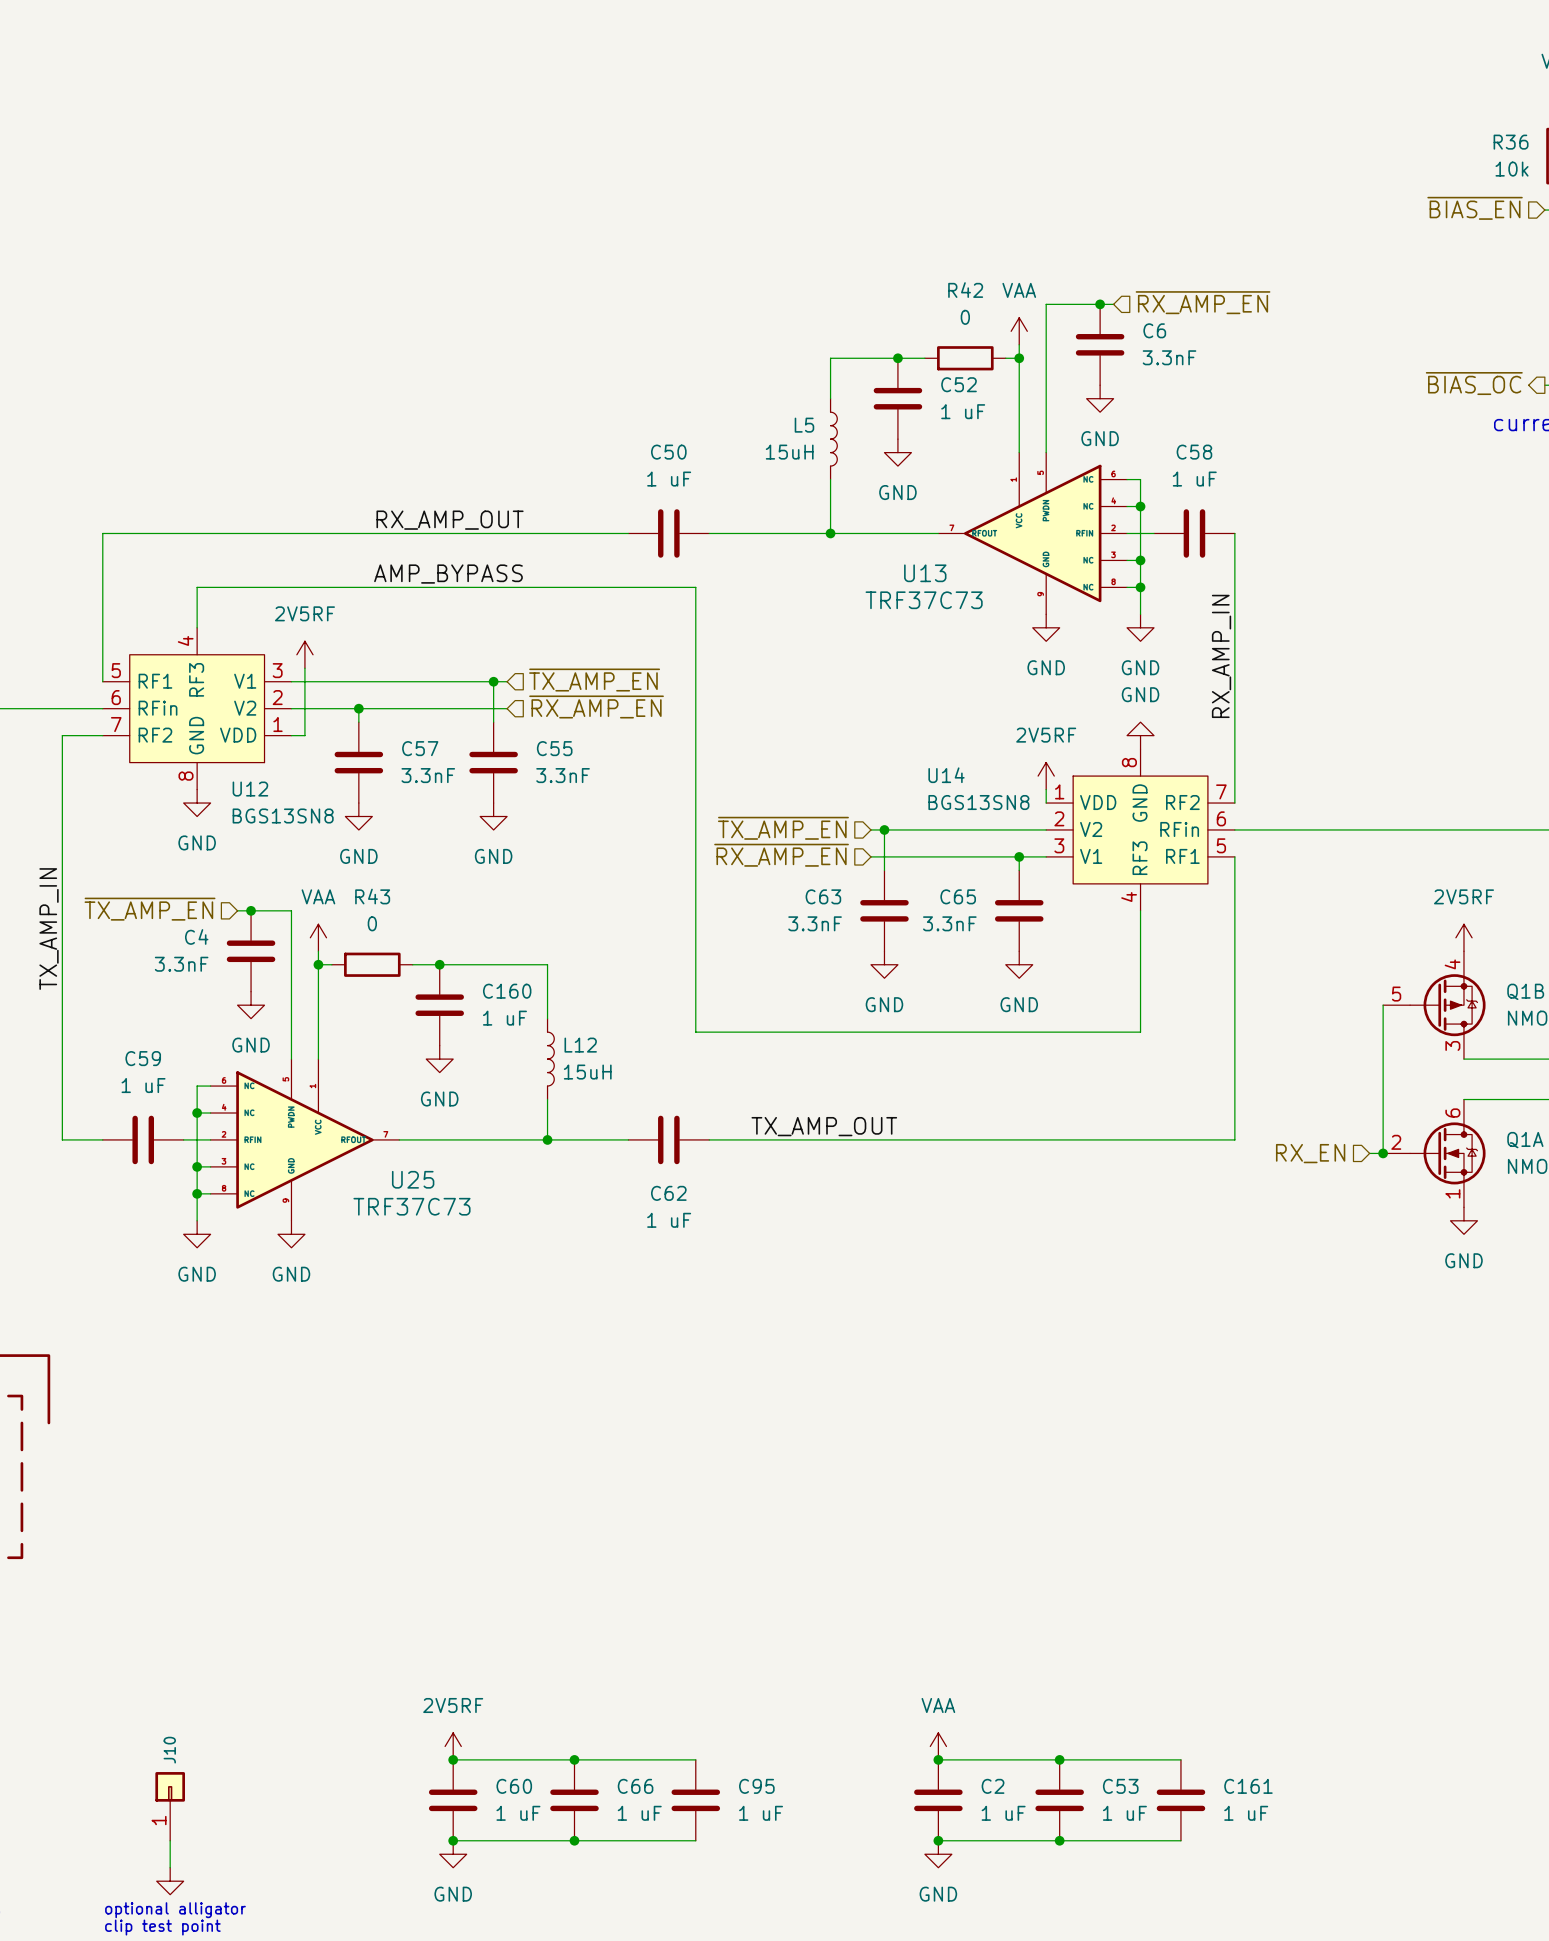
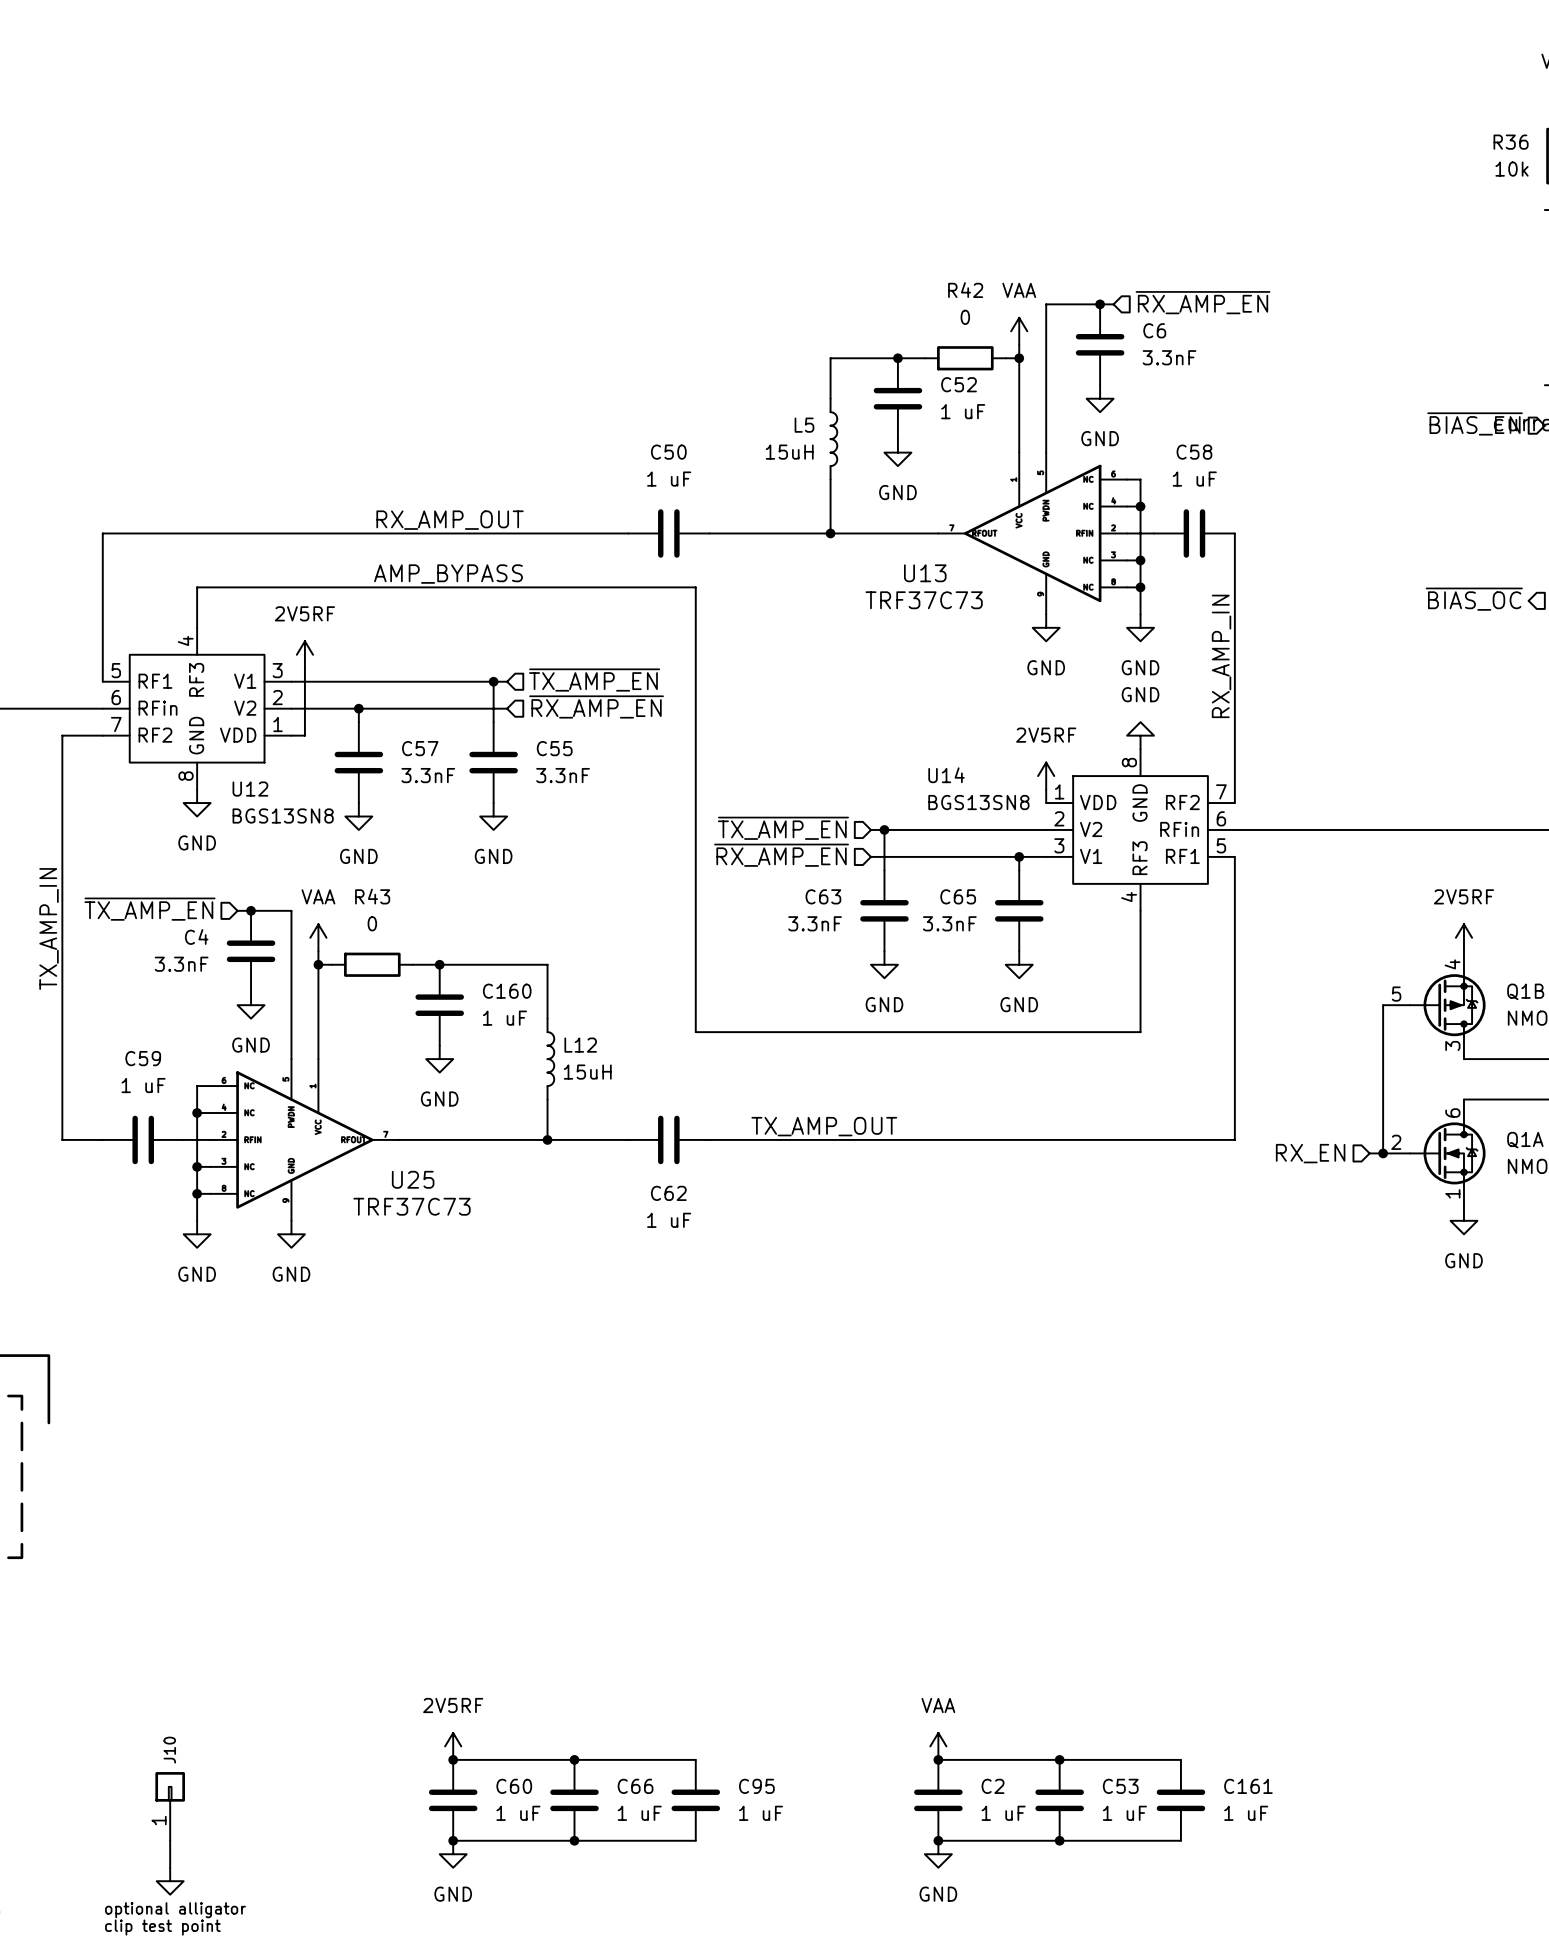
hierarchical label position: ~{BIAS_EN} (1475, 208) -> ~{BIAS_EN} (1475, 423)
hierarchical label position: ~{BIAS_OC} (1474, 383) -> ~{BIAS_OC} (1474, 599)

